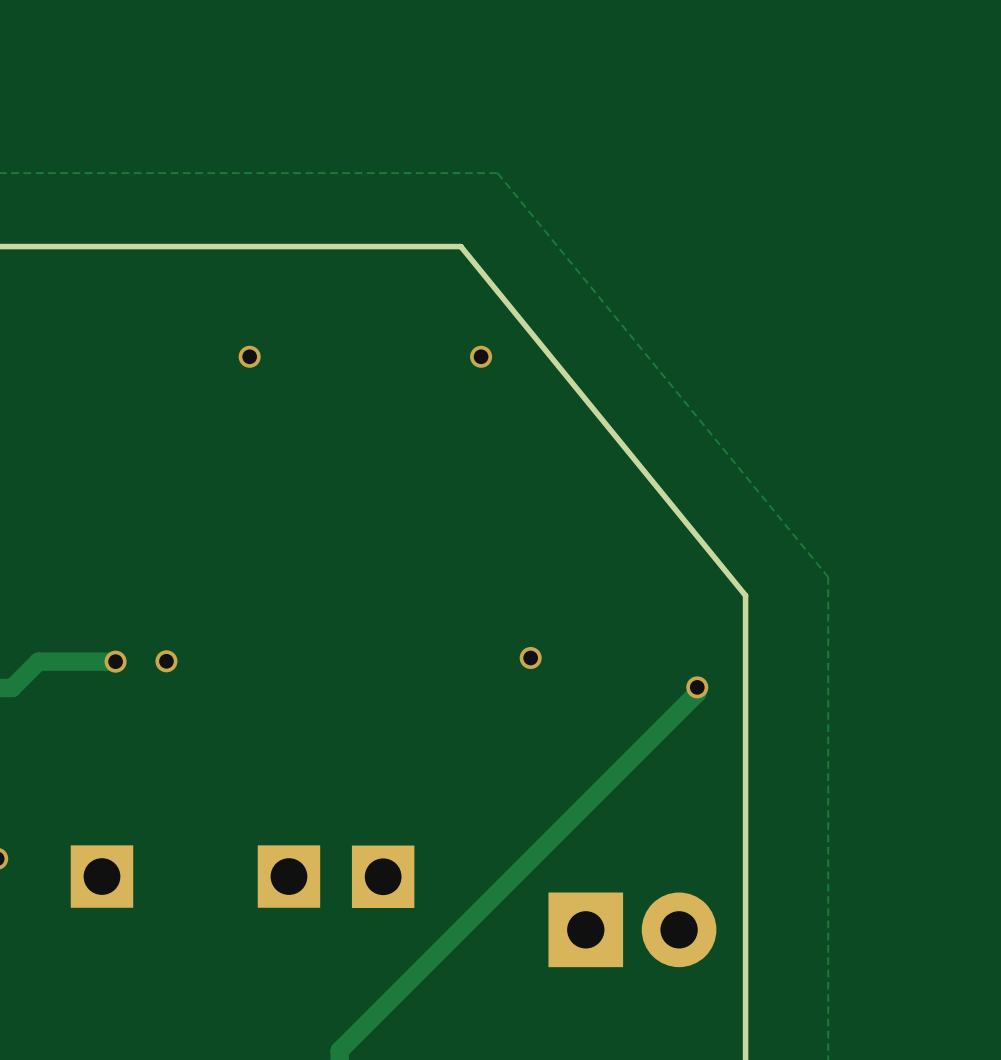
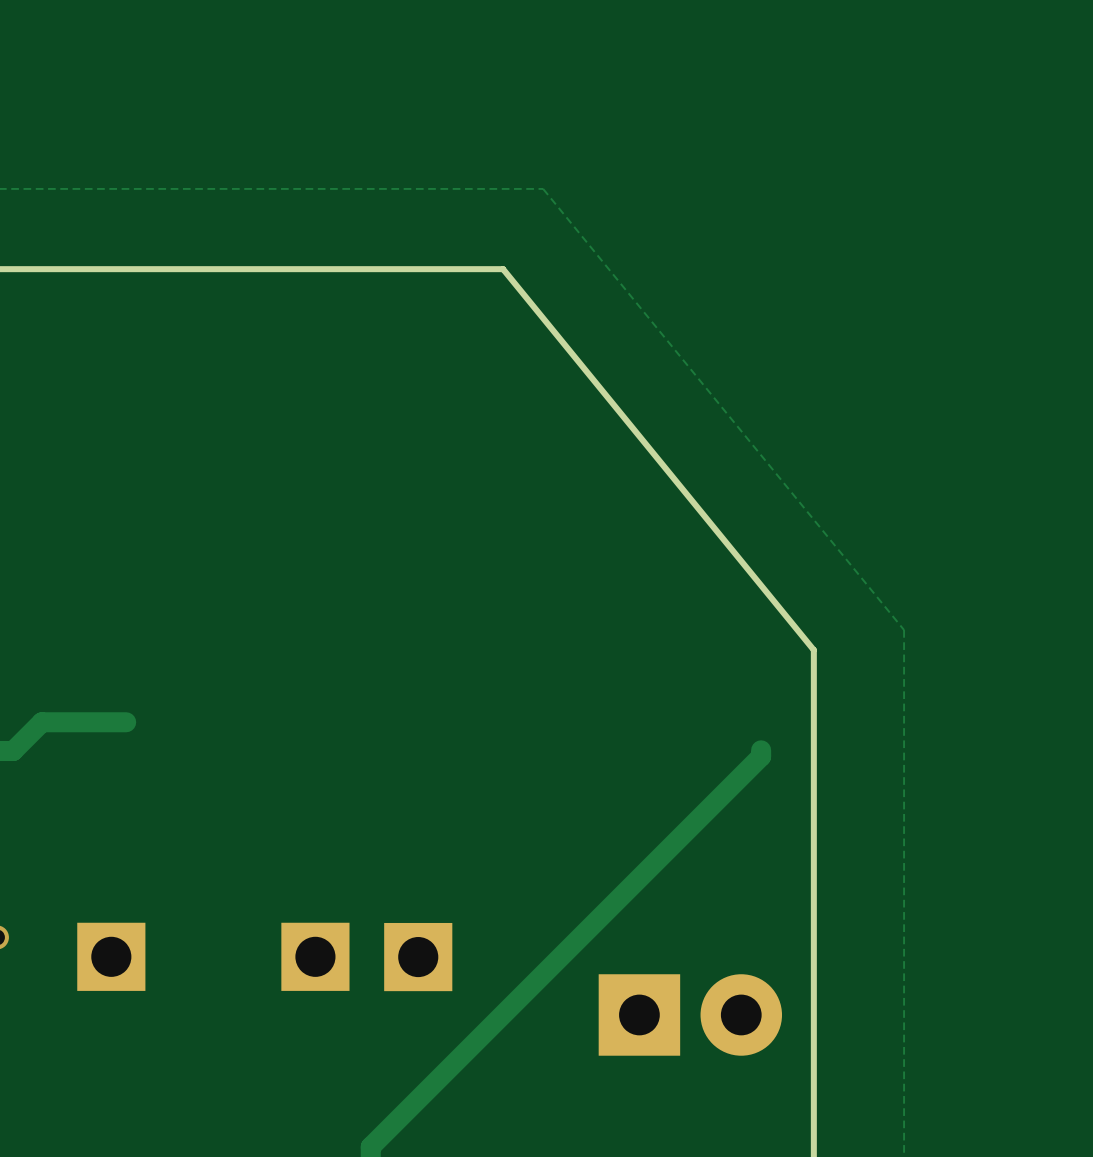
via: (249, 356) -> none
via: (481, 356) -> none
via: (530, 657) -> none
via: (115, 661) -> none
via: (166, 661) -> none
via: (697, 687) -> none

